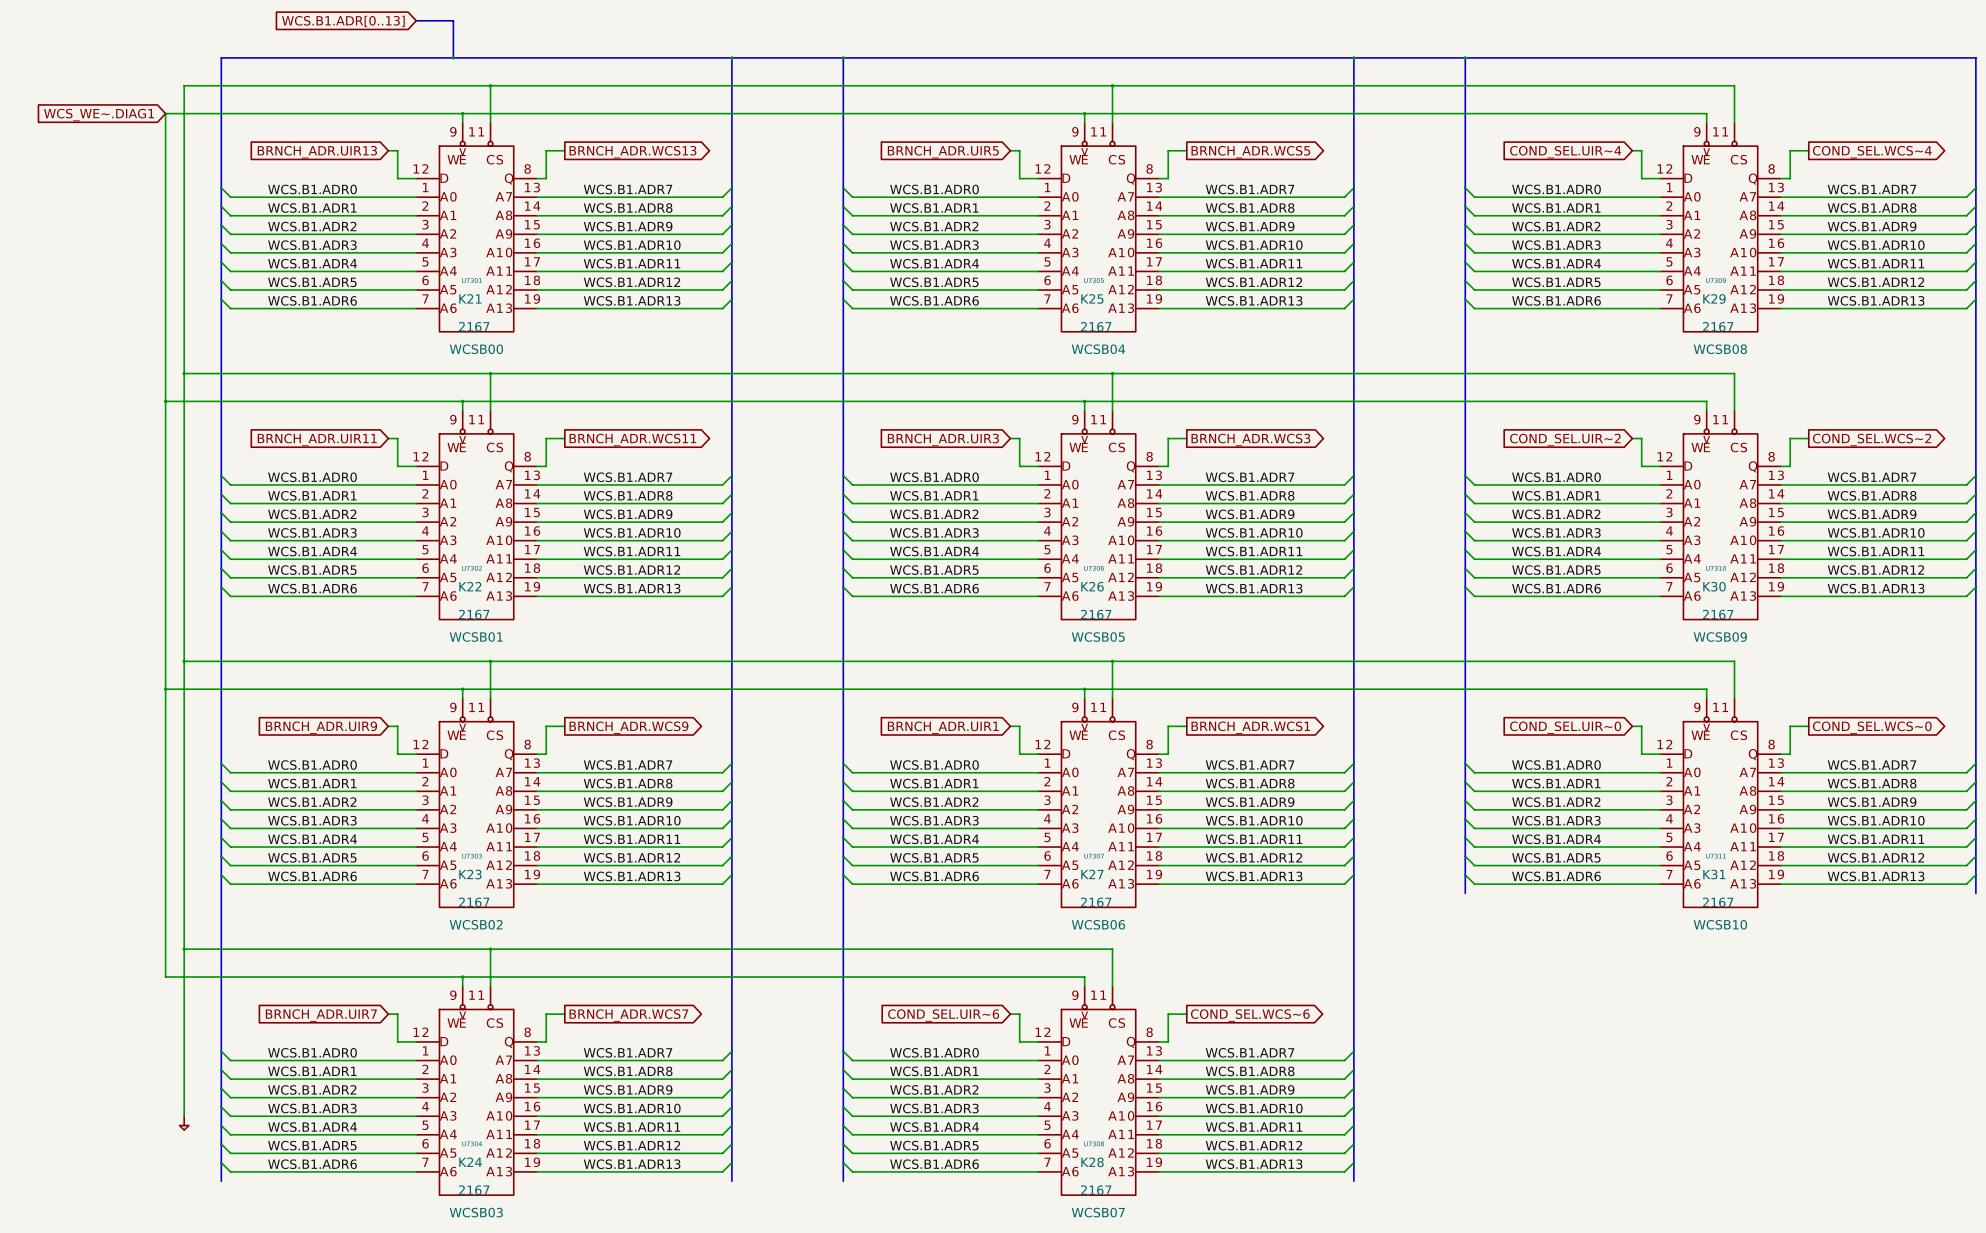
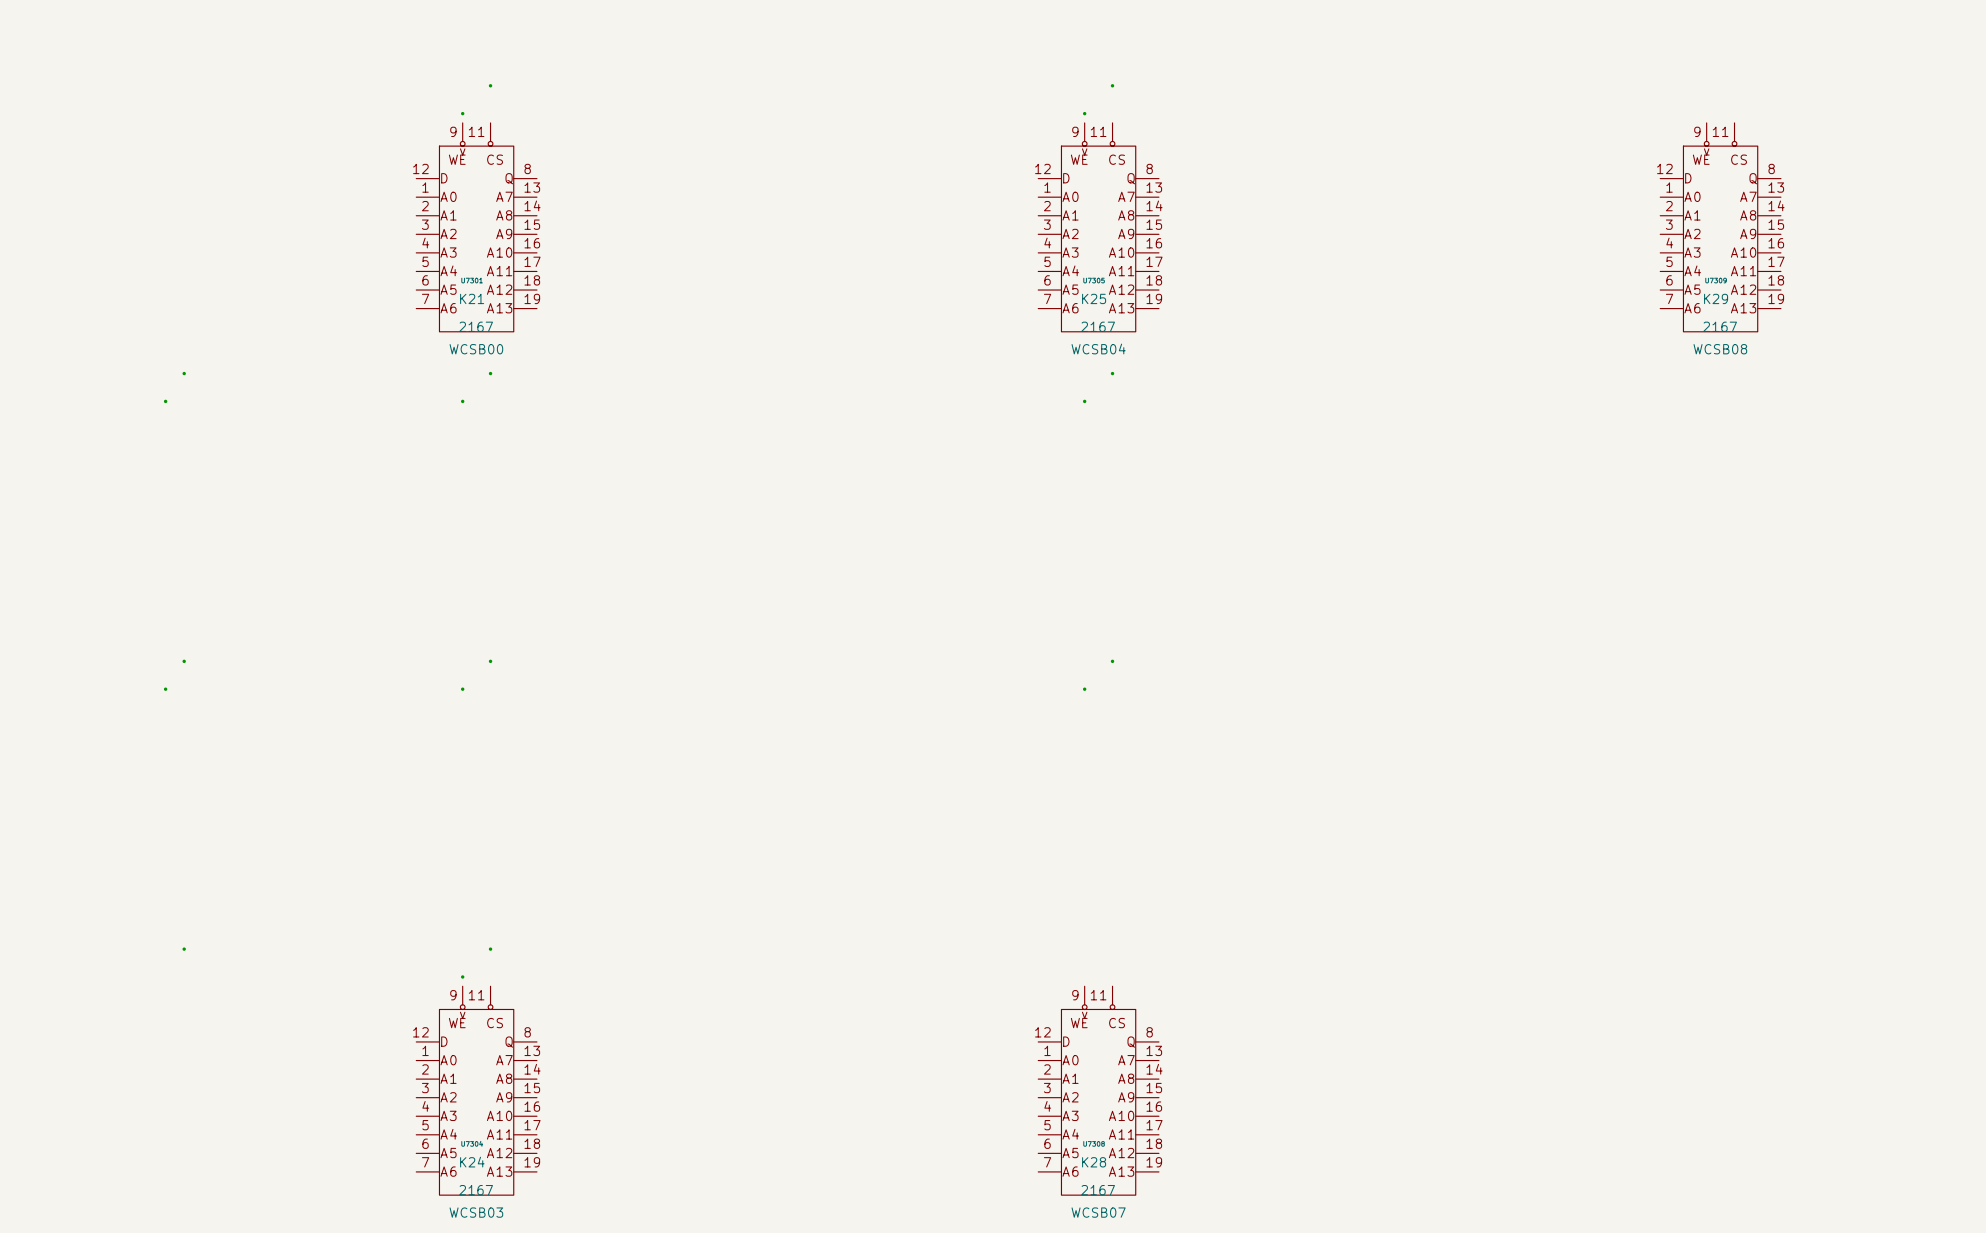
bus: (416, 20) (453, 20) (453, 57) -> none
global label: WCS.B1.ADR[0..13] (343, 21) -> none
junction: (453, 57) -> none
bus: (731, 57) (731, 1181) -> none
junction: (731, 57) -> none
bus: (843, 57) (843, 1181) -> none
junction: (843, 57) -> none
bus: (1353, 57) (1353, 1181) -> none
junction: (1353, 57) -> none
bus: (1465, 57) (1465, 893) -> none
junction: (1465, 57) -> none
wire: (490, 85) (490, 122) -> none
wire: (1112, 85) (1112, 122) -> none
wire: (462, 113) (462, 122) -> none
wire: (1084, 113) (1084, 122) -> none
global label: WCS_WE~.DIAG1 (99, 115) -> none
wire: (1706, 122) (1706, 113) (165, 113) (165, 976) (1084, 976) (1084, 986) -> none
wire: (1734, 122) (1734, 85) (184, 85) (184, 1116) -> none
wire: (388, 150) (397, 150) (397, 178) (416, 178) -> none
wire: (564, 150) (546, 150) (546, 178) (536, 178) -> none
wire: (1010, 150) (1019, 150) (1019, 178) (1038, 178) -> none
wire: (1186, 150) (1168, 150) (1168, 178) (1158, 178) -> none
wire: (1632, 150) (1641, 150) (1641, 178) (1660, 178) -> none
wire: (1808, 150) (1790, 150) (1790, 178) (1780, 178) -> none
global label: BRNCH_ADR.UIR13 (317, 152) -> none
global label: BRNCH_ADR.WCS13 (632, 152) -> none
global label: BRNCH_ADR.UIR5 (943, 152) -> none
global label: BRNCH_ADR.WCS5 (1250, 152) -> none
global label: COND_SEL.UIR~4 (1565, 152) -> none
global label: COND_SEL.WCS~4 (1872, 152) -> none
wire: (221, 187) (230, 197) (416, 197) -> none
wire: (731, 187) (722, 197) (536, 197) -> none
wire: (843, 187) (852, 197) (1038, 197) -> none
wire: (1353, 187) (1344, 197) (1158, 197) -> none
wire: (1465, 187) (1474, 197) (1660, 197) -> none
wire: (1975, 187) (1966, 197) (1780, 197) -> none
label: WCS.B1.ADR0 (312, 189) -> none
label: WCS.B1.ADR7 (628, 189) -> none
label: WCS.B1.ADR0 (934, 189) -> none
label: WCS.B1.ADR7 (1250, 189) -> none
label: WCS.B1.ADR0 (1556, 189) -> none
label: WCS.B1.ADR7 (1871, 189) -> none
wire: (221, 206) (230, 215) (416, 215) -> none
wire: (731, 206) (722, 215) (536, 215) -> none
wire: (843, 206) (852, 215) (1038, 215) -> none
wire: (1353, 206) (1344, 215) (1158, 215) -> none
wire: (1465, 206) (1474, 215) (1660, 215) -> none
wire: (1975, 206) (1966, 215) (1780, 215) -> none
label: WCS.B1.ADR1 (312, 208) -> none
label: WCS.B1.ADR8 (628, 208) -> none
label: WCS.B1.ADR1 (934, 208) -> none
label: WCS.B1.ADR8 (1250, 208) -> none
label: WCS.B1.ADR1 (1556, 208) -> none
label: WCS.B1.ADR8 (1872, 208) -> none
wire: (221, 225) (230, 234) (416, 234) -> none
wire: (731, 225) (722, 234) (536, 234) -> none
wire: (843, 225) (852, 234) (1038, 234) -> none
wire: (1353, 225) (1344, 234) (1158, 234) -> none
wire: (1465, 225) (1474, 234) (1660, 234) -> none
wire: (1975, 225) (1966, 234) (1780, 234) -> none
label: WCS.B1.ADR2 (312, 226) -> none
label: WCS.B1.ADR9 (628, 226) -> none
label: WCS.B1.ADR2 (934, 226) -> none
label: WCS.B1.ADR9 (1250, 226) -> none
label: WCS.B1.ADR2 (1556, 226) -> none
label: WCS.B1.ADR9 (1872, 226) -> none
wire: (221, 243) (230, 252) (416, 252) -> none
wire: (731, 243) (722, 252) (536, 252) -> none
wire: (843, 243) (852, 252) (1038, 252) -> none
wire: (1353, 243) (1344, 252) (1158, 252) -> none
wire: (1465, 243) (1474, 252) (1660, 252) -> none
wire: (1975, 243) (1966, 252) (1780, 252) -> none
label: WCS.B1.ADR3 (312, 245) -> none
label: WCS.B1.ADR10 (632, 245) -> none
label: WCS.B1.ADR3 (934, 245) -> none
label: WCS.B1.ADR10 (1254, 245) -> none
label: WCS.B1.ADR3 (1556, 245) -> none
label: WCS.B1.ADR10 (1876, 245) -> none
wire: (221, 262) (230, 271) (416, 271) -> none
wire: (731, 262) (722, 271) (536, 271) -> none
wire: (843, 262) (852, 271) (1038, 271) -> none
wire: (1353, 262) (1344, 271) (1158, 271) -> none
wire: (1465, 262) (1474, 271) (1660, 271) -> none
wire: (1975, 262) (1966, 271) (1780, 271) -> none
label: WCS.B1.ADR4 (312, 263) -> none
label: WCS.B1.ADR11 (632, 263) -> none
label: WCS.B1.ADR4 (934, 263) -> none
label: WCS.B1.ADR11 (1254, 263) -> none
label: WCS.B1.ADR4 (1556, 263) -> none
label: WCS.B1.ADR11 (1876, 263) -> none
wire: (221, 280) (230, 290) (416, 290) -> none
wire: (731, 280) (722, 290) (536, 290) -> none
wire: (843, 280) (852, 290) (1038, 290) -> none
wire: (1353, 280) (1344, 290) (1158, 290) -> none
wire: (1465, 280) (1474, 290) (1660, 290) -> none
wire: (1975, 280) (1966, 290) (1780, 290) -> none
label: WCS.B1.ADR5 (312, 282) -> none
label: WCS.B1.ADR12 (631, 282) -> none
label: WCS.B1.ADR5 (934, 282) -> none
label: WCS.B1.ADR12 (1253, 282) -> none
label: WCS.B1.ADR5 (1556, 282) -> none
label: WCS.B1.ADR12 (1875, 282) -> none
wire: (221, 299) (230, 308) (416, 308) -> none
wire: (731, 299) (722, 308) (536, 308) -> none
wire: (843, 299) (852, 308) (1038, 308) -> none
wire: (1353, 299) (1344, 308) (1158, 308) -> none
wire: (1465, 299) (1474, 308) (1660, 308) -> none
wire: (1975, 299) (1966, 308) (1780, 308) -> none
label: WCS.B1.ADR6 (312, 300) -> none
label: WCS.B1.ADR13 (632, 300) -> none
label: WCS.B1.ADR6 (934, 300) -> none
label: WCS.B1.ADR13 (1254, 300) -> none
label: WCS.B1.ADR6 (1556, 300) -> none
label: WCS.B1.ADR13 (1876, 300) -> none
wire: (184, 373) (1734, 373) (1734, 410) -> none
wire: (490, 373) (490, 410) -> none
wire: (1112, 373) (1112, 410) -> none
wire: (165, 401) (1706, 401) (1706, 410) -> none
wire: (462, 401) (462, 410) -> none
wire: (1084, 401) (1084, 410) -> none
wire: (388, 438) (397, 438) (397, 466) (416, 466) -> none
wire: (564, 438) (546, 438) (546, 466) (536, 466) -> none
wire: (1010, 438) (1019, 438) (1019, 466) (1038, 466) -> none
wire: (1186, 438) (1168, 438) (1168, 466) (1158, 466) -> none
wire: (1632, 438) (1641, 438) (1641, 466) (1660, 466) -> none
wire: (1808, 438) (1790, 438) (1790, 466) (1780, 466) -> none
global label: BRNCH_ADR.UIR11 (317, 439) -> none
global label: BRNCH_ADR.WCS11 (632, 439) -> none
global label: BRNCH_ADR.UIR3 (943, 439) -> none
global label: BRNCH_ADR.WCS3 (1250, 439) -> none
global label: COND_SEL.UIR~2 (1565, 439) -> none
global label: COND_SEL.WCS~2 (1872, 439) -> none
wire: (221, 475) (230, 484) (416, 484) -> none
wire: (731, 475) (722, 484) (536, 484) -> none
wire: (843, 475) (852, 484) (1038, 484) -> none
wire: (1353, 475) (1344, 484) (1158, 484) -> none
wire: (1465, 475) (1474, 484) (1660, 484) -> none
wire: (1975, 475) (1966, 484) (1780, 484) -> none
label: WCS.B1.ADR0 (312, 477) -> none
label: WCS.B1.ADR7 (628, 477) -> none
label: WCS.B1.ADR0 (934, 477) -> none
label: WCS.B1.ADR7 (1250, 477) -> none
label: WCS.B1.ADR0 (1556, 477) -> none
label: WCS.B1.ADR7 (1871, 477) -> none
wire: (221, 494) (230, 503) (416, 503) -> none
wire: (731, 494) (722, 503) (536, 503) -> none
wire: (843, 494) (852, 503) (1038, 503) -> none
wire: (1353, 494) (1344, 503) (1158, 503) -> none
wire: (1465, 494) (1474, 503) (1660, 503) -> none
wire: (1975, 494) (1966, 503) (1780, 503) -> none
label: WCS.B1.ADR1 (312, 495) -> none
label: WCS.B1.ADR8 (628, 495) -> none
label: WCS.B1.ADR1 (934, 495) -> none
label: WCS.B1.ADR8 (1250, 495) -> none
label: WCS.B1.ADR1 (1556, 495) -> none
label: WCS.B1.ADR8 (1872, 495) -> none
wire: (221, 512) (230, 522) (416, 522) -> none
wire: (731, 512) (722, 522) (536, 522) -> none
wire: (843, 512) (852, 522) (1038, 522) -> none
wire: (1353, 512) (1344, 522) (1158, 522) -> none
wire: (1465, 512) (1474, 522) (1660, 522) -> none
wire: (1975, 512) (1966, 522) (1780, 522) -> none
label: WCS.B1.ADR2 (312, 514) -> none
label: WCS.B1.ADR9 (628, 514) -> none
label: WCS.B1.ADR2 (934, 514) -> none
label: WCS.B1.ADR9 (1250, 514) -> none
label: WCS.B1.ADR2 (1556, 514) -> none
label: WCS.B1.ADR9 (1872, 514) -> none
part: 2167 (476, 515) -> none
part: 2167 (1098, 515) -> none
part: 2167 (1720, 515) -> none
wire: (221, 531) (230, 540) (416, 540) -> none
wire: (731, 531) (722, 540) (536, 540) -> none
wire: (843, 531) (852, 540) (1038, 540) -> none
wire: (1353, 531) (1344, 540) (1158, 540) -> none
wire: (1465, 531) (1474, 540) (1660, 540) -> none
wire: (1975, 531) (1966, 540) (1780, 540) -> none
label: WCS.B1.ADR3 (312, 532) -> none
label: WCS.B1.ADR10 (632, 532) -> none
label: WCS.B1.ADR3 (934, 532) -> none
label: WCS.B1.ADR10 (1254, 532) -> none
label: WCS.B1.ADR3 (1556, 532) -> none
label: WCS.B1.ADR10 (1876, 532) -> none
wire: (221, 549) (230, 559) (416, 559) -> none
wire: (731, 549) (722, 559) (536, 559) -> none
wire: (843, 549) (852, 559) (1038, 559) -> none
wire: (1353, 549) (1344, 559) (1158, 559) -> none
wire: (1465, 549) (1474, 559) (1660, 559) -> none
wire: (1975, 549) (1966, 559) (1780, 559) -> none
label: WCS.B1.ADR4 (312, 551) -> none
label: WCS.B1.ADR11 (632, 551) -> none
label: WCS.B1.ADR4 (934, 551) -> none
label: WCS.B1.ADR11 (1254, 551) -> none
label: WCS.B1.ADR4 (1556, 551) -> none
label: WCS.B1.ADR11 (1876, 551) -> none
wire: (221, 568) (230, 577) (416, 577) -> none
wire: (731, 568) (722, 577) (536, 577) -> none
wire: (843, 568) (852, 577) (1038, 577) -> none
wire: (1353, 568) (1344, 577) (1158, 577) -> none
wire: (1465, 568) (1474, 577) (1660, 577) -> none
wire: (1975, 568) (1966, 577) (1780, 577) -> none
label: WCS.B1.ADR5 (312, 570) -> none
label: WCS.B1.ADR12 (631, 570) -> none
label: WCS.B1.ADR5 (934, 570) -> none
label: WCS.B1.ADR12 (1253, 570) -> none
label: WCS.B1.ADR5 (1556, 570) -> none
label: WCS.B1.ADR12 (1875, 570) -> none
wire: (221, 587) (230, 596) (416, 596) -> none
wire: (731, 587) (722, 596) (536, 596) -> none
wire: (843, 587) (852, 596) (1038, 596) -> none
wire: (1353, 587) (1344, 596) (1158, 596) -> none
wire: (1465, 587) (1474, 596) (1660, 596) -> none
wire: (1975, 587) (1966, 596) (1780, 596) -> none
label: WCS.B1.ADR6 (312, 588) -> none
label: WCS.B1.ADR13 (632, 588) -> none
label: WCS.B1.ADR6 (934, 588) -> none
label: WCS.B1.ADR13 (1254, 588) -> none
label: WCS.B1.ADR6 (1556, 588) -> none
label: WCS.B1.ADR13 (1876, 588) -> none
wire: (184, 661) (1734, 661) (1734, 698) -> none
wire: (490, 661) (490, 698) -> none
wire: (1112, 661) (1112, 698) -> none
wire: (165, 689) (1706, 689) (1706, 698) -> none
wire: (462, 689) (462, 698) -> none
wire: (1084, 689) (1084, 698) -> none
wire: (388, 726) (397, 726) (397, 754) (416, 754) -> none
wire: (564, 726) (546, 726) (546, 754) (536, 754) -> none
wire: (1010, 726) (1019, 726) (1019, 754) (1038, 754) -> none
wire: (1186, 726) (1168, 726) (1168, 754) (1158, 754) -> none
wire: (1632, 726) (1641, 726) (1641, 754) (1660, 754) -> none
wire: (1808, 726) (1790, 726) (1790, 754) (1780, 754) -> none
global label: BRNCH_ADR.UIR9 (321, 727) -> none
global label: BRNCH_ADR.WCS9 (628, 727) -> none
global label: BRNCH_ADR.UIR1 (943, 727) -> none
global label: BRNCH_ADR.WCS1 (1250, 727) -> none
global label: COND_SEL.UIR~0 (1565, 727) -> none
global label: COND_SEL.WCS~0 (1872, 727) -> none
wire: (221, 763) (230, 772) (416, 772) -> none
wire: (731, 763) (722, 772) (536, 772) -> none
wire: (843, 763) (852, 772) (1038, 772) -> none
wire: (1353, 763) (1344, 772) (1158, 772) -> none
wire: (1465, 763) (1474, 772) (1660, 772) -> none
wire: (1975, 763) (1966, 772) (1780, 772) -> none
label: WCS.B1.ADR0 (312, 765) -> none
label: WCS.B1.ADR7 (628, 765) -> none
label: WCS.B1.ADR0 (934, 765) -> none
label: WCS.B1.ADR7 (1250, 765) -> none
label: WCS.B1.ADR0 (1556, 765) -> none
label: WCS.B1.ADR7 (1871, 765) -> none
wire: (221, 782) (230, 791) (416, 791) -> none
wire: (731, 782) (722, 791) (536, 791) -> none
wire: (843, 782) (852, 791) (1038, 791) -> none
wire: (1353, 782) (1344, 791) (1158, 791) -> none
wire: (1465, 782) (1474, 791) (1660, 791) -> none
wire: (1975, 782) (1966, 791) (1780, 791) -> none
label: WCS.B1.ADR1 (312, 783) -> none
label: WCS.B1.ADR8 (628, 783) -> none
label: WCS.B1.ADR1 (934, 783) -> none
label: WCS.B1.ADR8 (1250, 783) -> none
label: WCS.B1.ADR1 (1556, 783) -> none
label: WCS.B1.ADR8 (1872, 783) -> none
wire: (221, 800) (230, 809) (416, 809) -> none
wire: (731, 800) (722, 809) (536, 809) -> none
wire: (843, 800) (852, 809) (1038, 809) -> none
wire: (1353, 800) (1344, 809) (1158, 809) -> none
wire: (1465, 800) (1474, 809) (1660, 809) -> none
wire: (1975, 800) (1966, 809) (1780, 809) -> none
label: WCS.B1.ADR2 (312, 802) -> none
part: 2167 (476, 802) -> none
label: WCS.B1.ADR9 (628, 802) -> none
label: WCS.B1.ADR2 (934, 802) -> none
part: 2167 (1098, 802) -> none
label: WCS.B1.ADR9 (1250, 802) -> none
label: WCS.B1.ADR2 (1556, 802) -> none
part: 2167 (1720, 802) -> none
label: WCS.B1.ADR9 (1872, 802) -> none
wire: (221, 819) (230, 828) (416, 828) -> none
wire: (731, 819) (722, 828) (536, 828) -> none
wire: (843, 819) (852, 828) (1038, 828) -> none
wire: (1353, 819) (1344, 828) (1158, 828) -> none
wire: (1465, 819) (1474, 828) (1660, 828) -> none
wire: (1975, 819) (1966, 828) (1780, 828) -> none
label: WCS.B1.ADR3 (312, 820) -> none
label: WCS.B1.ADR10 (632, 820) -> none
label: WCS.B1.ADR3 (934, 820) -> none
label: WCS.B1.ADR10 (1254, 820) -> none
label: WCS.B1.ADR3 (1556, 820) -> none
label: WCS.B1.ADR10 (1876, 820) -> none
wire: (221, 837) (230, 847) (416, 847) -> none
wire: (731, 837) (722, 847) (536, 847) -> none
wire: (843, 837) (852, 847) (1038, 847) -> none
wire: (1353, 837) (1344, 847) (1158, 847) -> none
wire: (1465, 837) (1474, 847) (1660, 847) -> none
wire: (1975, 837) (1966, 847) (1780, 847) -> none
label: WCS.B1.ADR4 (312, 839) -> none
label: WCS.B1.ADR11 (632, 839) -> none
label: WCS.B1.ADR4 (934, 839) -> none
label: WCS.B1.ADR11 (1254, 839) -> none
label: WCS.B1.ADR4 (1556, 839) -> none
label: WCS.B1.ADR11 (1876, 839) -> none
wire: (221, 856) (230, 865) (416, 865) -> none
wire: (731, 856) (722, 865) (536, 865) -> none
wire: (843, 856) (852, 865) (1038, 865) -> none
wire: (1353, 856) (1344, 865) (1158, 865) -> none
wire: (1465, 856) (1474, 865) (1660, 865) -> none
wire: (1975, 856) (1966, 865) (1780, 865) -> none
label: WCS.B1.ADR5 (312, 857) -> none
label: WCS.B1.ADR12 (631, 857) -> none
label: WCS.B1.ADR5 (934, 857) -> none
label: WCS.B1.ADR12 (1253, 857) -> none
label: WCS.B1.ADR5 (1556, 857) -> none
label: WCS.B1.ADR12 (1875, 857) -> none
wire: (221, 874) (230, 884) (416, 884) -> none
wire: (731, 874) (722, 884) (536, 884) -> none
wire: (843, 874) (852, 884) (1038, 884) -> none
wire: (1353, 874) (1344, 884) (1158, 884) -> none
wire: (1465, 874) (1474, 884) (1660, 884) -> none
wire: (1975, 874) (1966, 884) (1780, 884) -> none
label: WCS.B1.ADR6 (312, 876) -> none
label: WCS.B1.ADR13 (632, 876) -> none
label: WCS.B1.ADR6 (934, 876) -> none
label: WCS.B1.ADR13 (1254, 876) -> none
label: WCS.B1.ADR6 (1556, 876) -> none
label: WCS.B1.ADR13 (1876, 876) -> none
bus: (1975, 893) (1975, 57) (221, 57) (221, 1181) -> none
wire: (184, 949) (1112, 949) (1112, 986) -> none
wire: (490, 949) (490, 986) -> none
wire: (462, 976) (462, 986) -> none
wire: (388, 1014) (397, 1014) (397, 1041) (416, 1041) -> none
wire: (564, 1014) (546, 1014) (546, 1041) (536, 1041) -> none
wire: (1010, 1014) (1019, 1014) (1019, 1041) (1038, 1041) -> none
wire: (1186, 1014) (1168, 1014) (1168, 1041) (1158, 1041) -> none
global label: BRNCH_ADR.UIR7 (321, 1015) -> none
global label: BRNCH_ADR.WCS7 (628, 1015) -> none
global label: COND_SEL.UIR~6 (943, 1015) -> none
global label: COND_SEL.WCS~6 (1250, 1015) -> none
wire: (221, 1051) (230, 1060) (416, 1060) -> none
wire: (731, 1051) (722, 1060) (536, 1060) -> none
wire: (843, 1051) (852, 1060) (1038, 1060) -> none
wire: (1353, 1051) (1344, 1060) (1158, 1060) -> none
label: WCS.B1.ADR0 (312, 1052) -> none
label: WCS.B1.ADR7 (628, 1052) -> none
label: WCS.B1.ADR0 (934, 1052) -> none
label: WCS.B1.ADR7 (1250, 1052) -> none
wire: (221, 1069) (230, 1079) (416, 1079) -> none
wire: (731, 1069) (722, 1079) (536, 1079) -> none
wire: (843, 1069) (852, 1079) (1038, 1079) -> none
wire: (1353, 1069) (1344, 1079) (1158, 1079) -> none
label: WCS.B1.ADR1 (312, 1071) -> none
label: WCS.B1.ADR8 (628, 1071) -> none
label: WCS.B1.ADR1 (934, 1071) -> none
label: WCS.B1.ADR8 (1250, 1071) -> none
wire: (221, 1088) (230, 1097) (416, 1097) -> none
wire: (731, 1088) (722, 1097) (536, 1097) -> none
wire: (843, 1088) (852, 1097) (1038, 1097) -> none
wire: (1353, 1088) (1344, 1097) (1158, 1097) -> none
label: WCS.B1.ADR2 (312, 1089) -> none
label: WCS.B1.ADR9 (628, 1089) -> none
label: WCS.B1.ADR2 (934, 1089) -> none
label: WCS.B1.ADR9 (1250, 1089) -> none
wire: (221, 1106) (230, 1116) (416, 1116) -> none
wire: (731, 1106) (722, 1116) (536, 1116) -> none
wire: (843, 1106) (852, 1116) (1038, 1116) -> none
wire: (1353, 1106) (1344, 1116) (1158, 1116) -> none
label: WCS.B1.ADR3 (312, 1108) -> none
label: WCS.B1.ADR10 (632, 1108) -> none
label: WCS.B1.ADR3 (934, 1108) -> none
label: WCS.B1.ADR10 (1254, 1108) -> none
power symbol: (184, 1123) -> none
wire: (221, 1125) (230, 1134) (416, 1134) -> none
wire: (731, 1125) (722, 1134) (536, 1134) -> none
wire: (843, 1125) (852, 1134) (1038, 1134) -> none
wire: (1353, 1125) (1344, 1134) (1158, 1134) -> none
label: WCS.B1.ADR4 (312, 1127) -> none
label: WCS.B1.ADR11 (632, 1127) -> none
label: WCS.B1.ADR4 (934, 1127) -> none
label: WCS.B1.ADR11 (1254, 1127) -> none
wire: (221, 1144) (230, 1153) (416, 1153) -> none
wire: (731, 1144) (722, 1153) (536, 1153) -> none
wire: (843, 1144) (852, 1153) (1038, 1153) -> none
wire: (1353, 1144) (1344, 1153) (1158, 1153) -> none
label: WCS.B1.ADR5 (312, 1145) -> none
label: WCS.B1.ADR12 (631, 1145) -> none
label: WCS.B1.ADR5 (934, 1145) -> none
label: WCS.B1.ADR12 (1253, 1145) -> none
wire: (221, 1162) (230, 1171) (416, 1171) -> none
wire: (731, 1162) (722, 1171) (536, 1171) -> none
wire: (843, 1162) (852, 1171) (1038, 1171) -> none
wire: (1353, 1162) (1344, 1171) (1158, 1171) -> none
label: WCS.B1.ADR6 (312, 1164) -> none
label: WCS.B1.ADR13 (632, 1164) -> none
label: WCS.B1.ADR6 (934, 1164) -> none
label: WCS.B1.ADR13 (1254, 1164) -> none

